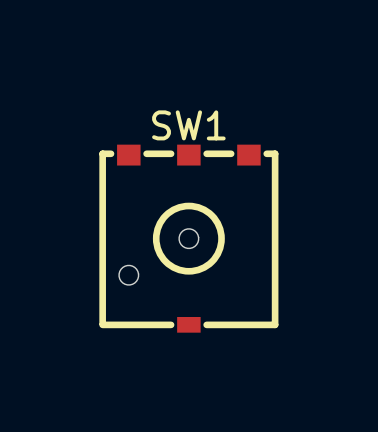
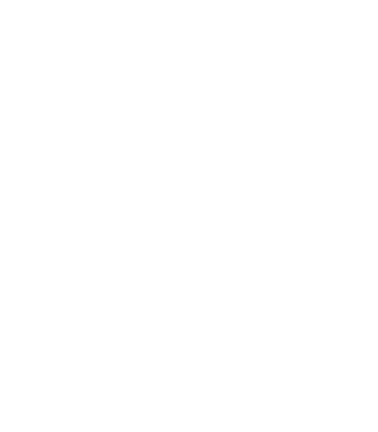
SW1: (188, 238) -> none

